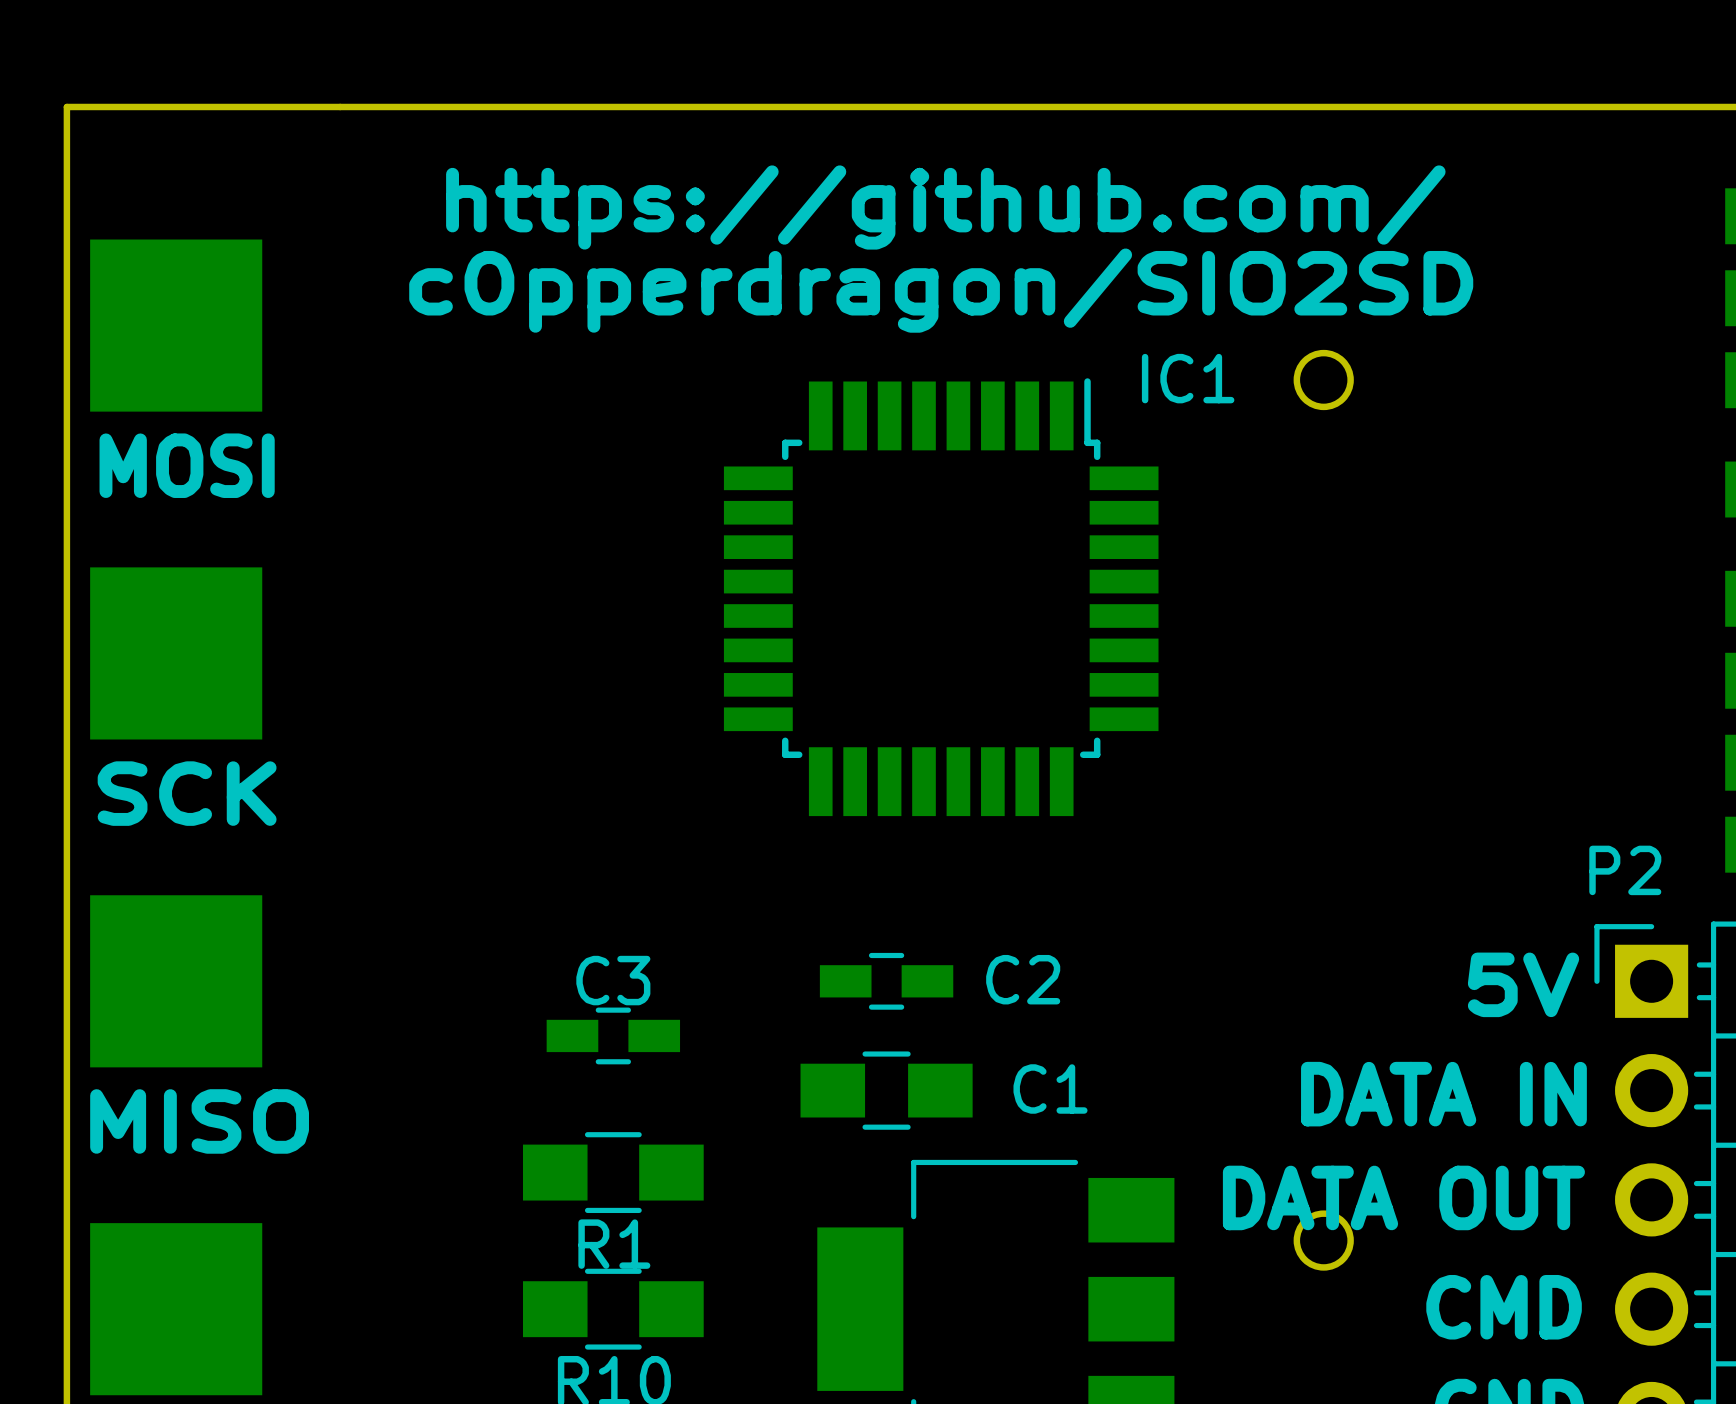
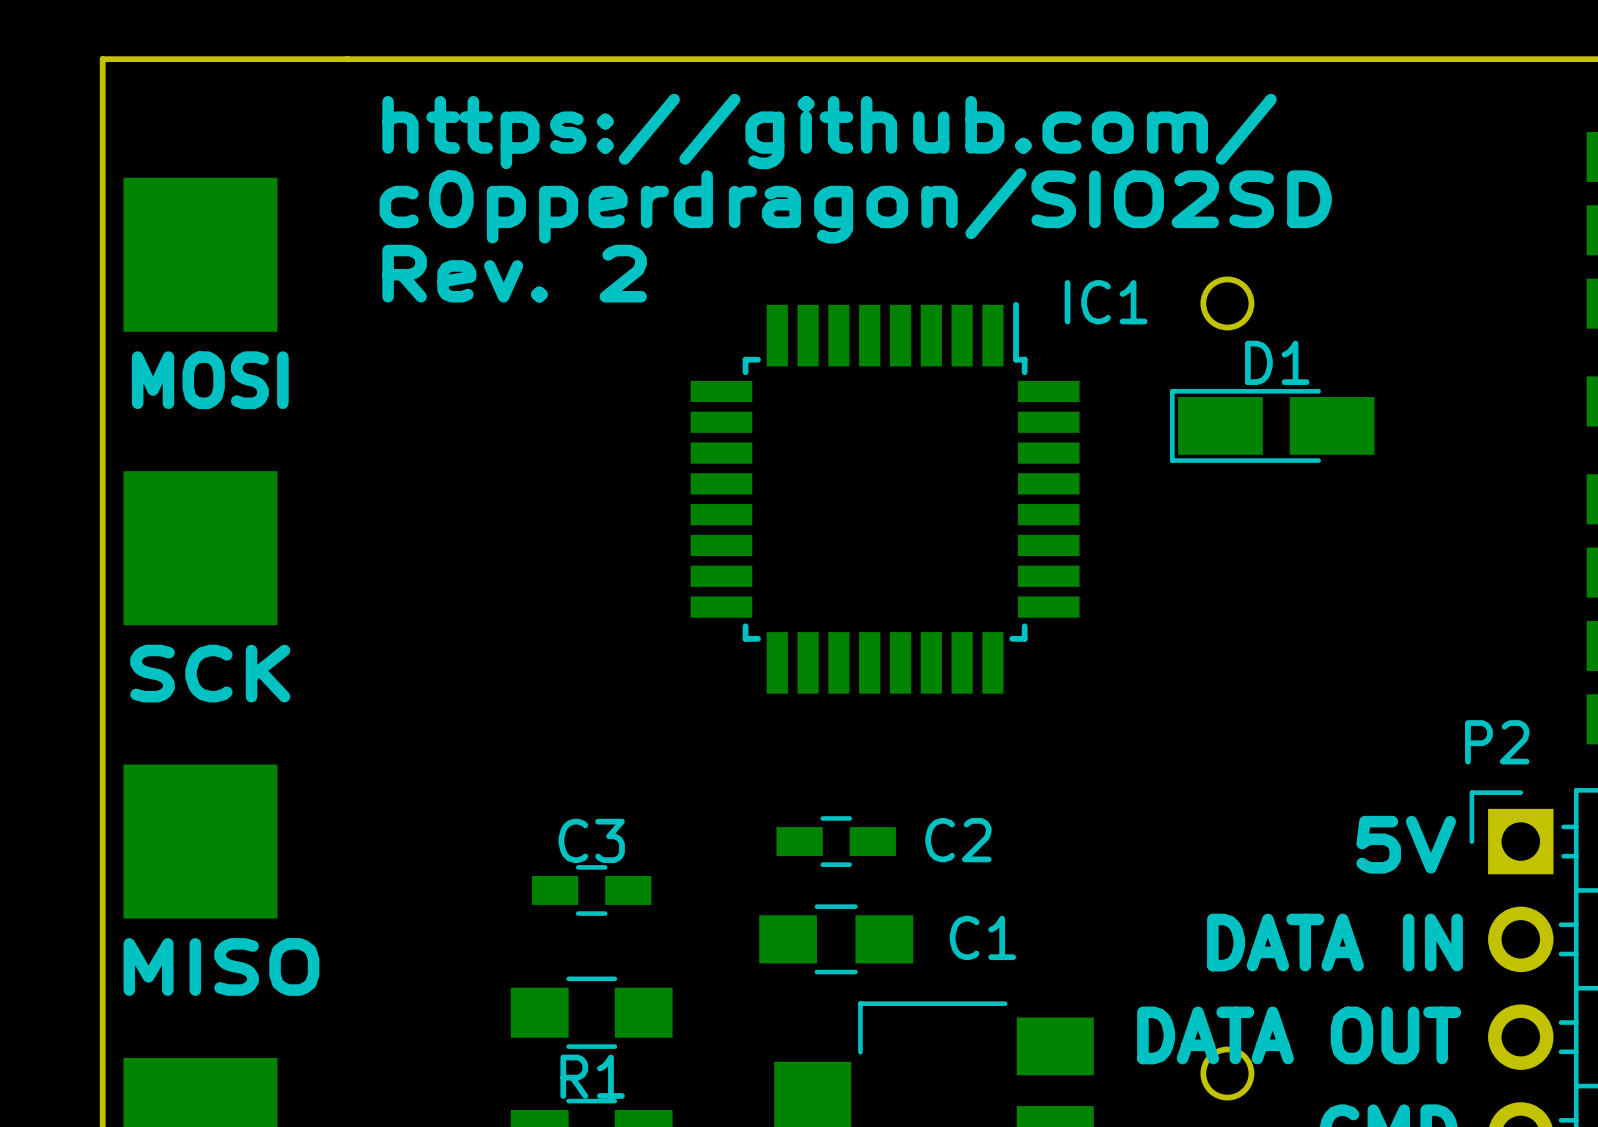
text position: https://github.com/ (945, 207) -> https://github.com/ (829, 131)
text position: c0pperdragon/SIO2SD (941, 290) -> c0pperdragon/SIO2SD (855, 205)
text: none -> Rev. 2 (514, 273)
D1: none -> (1272, 425)

